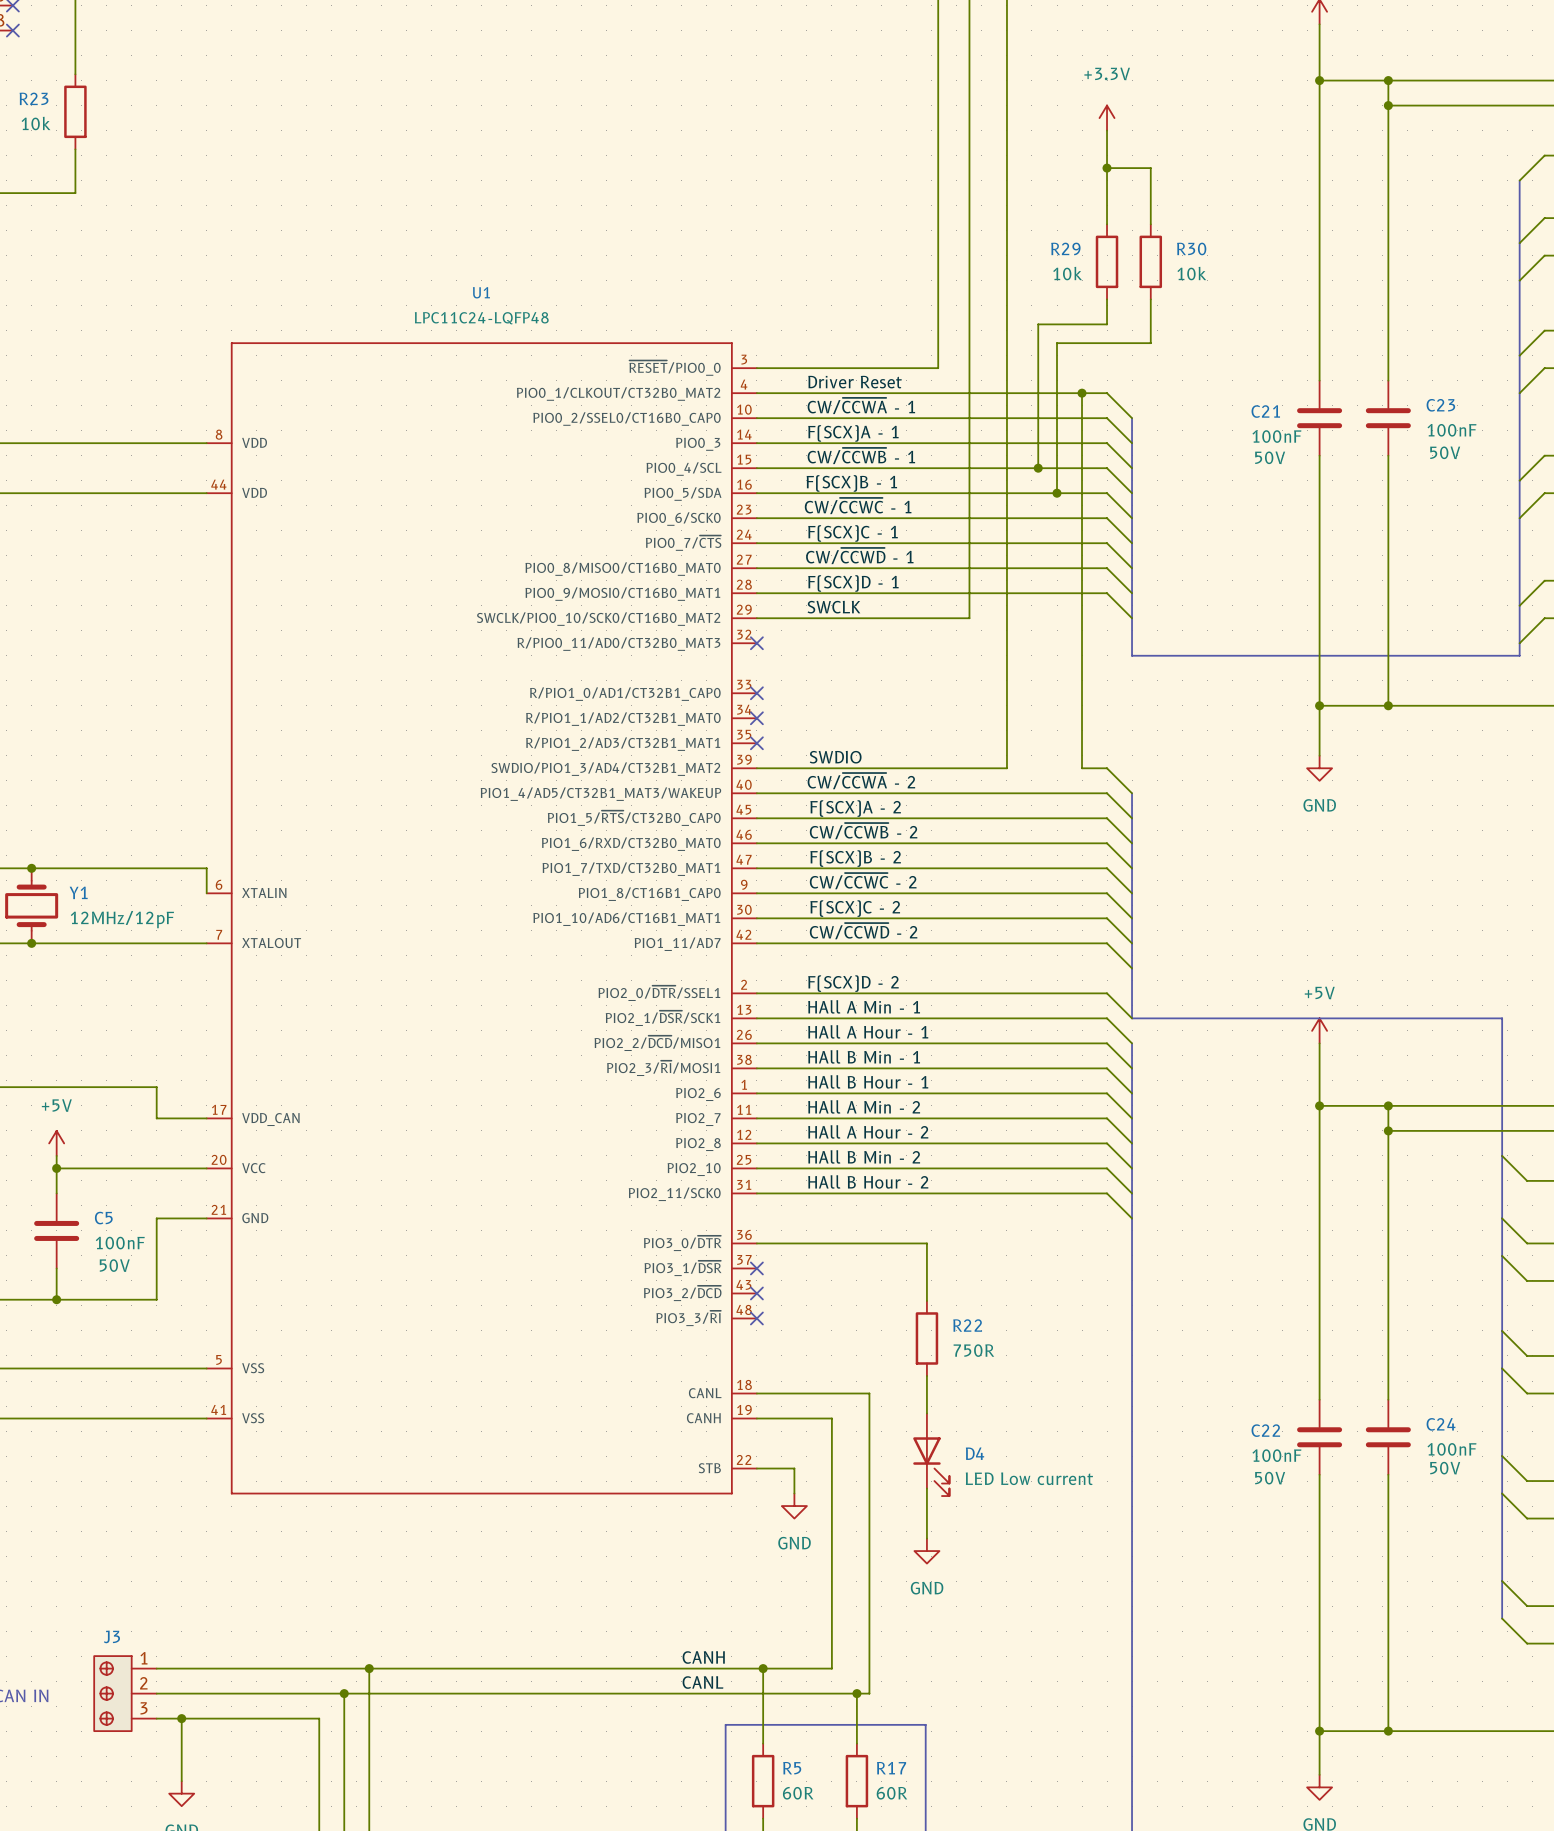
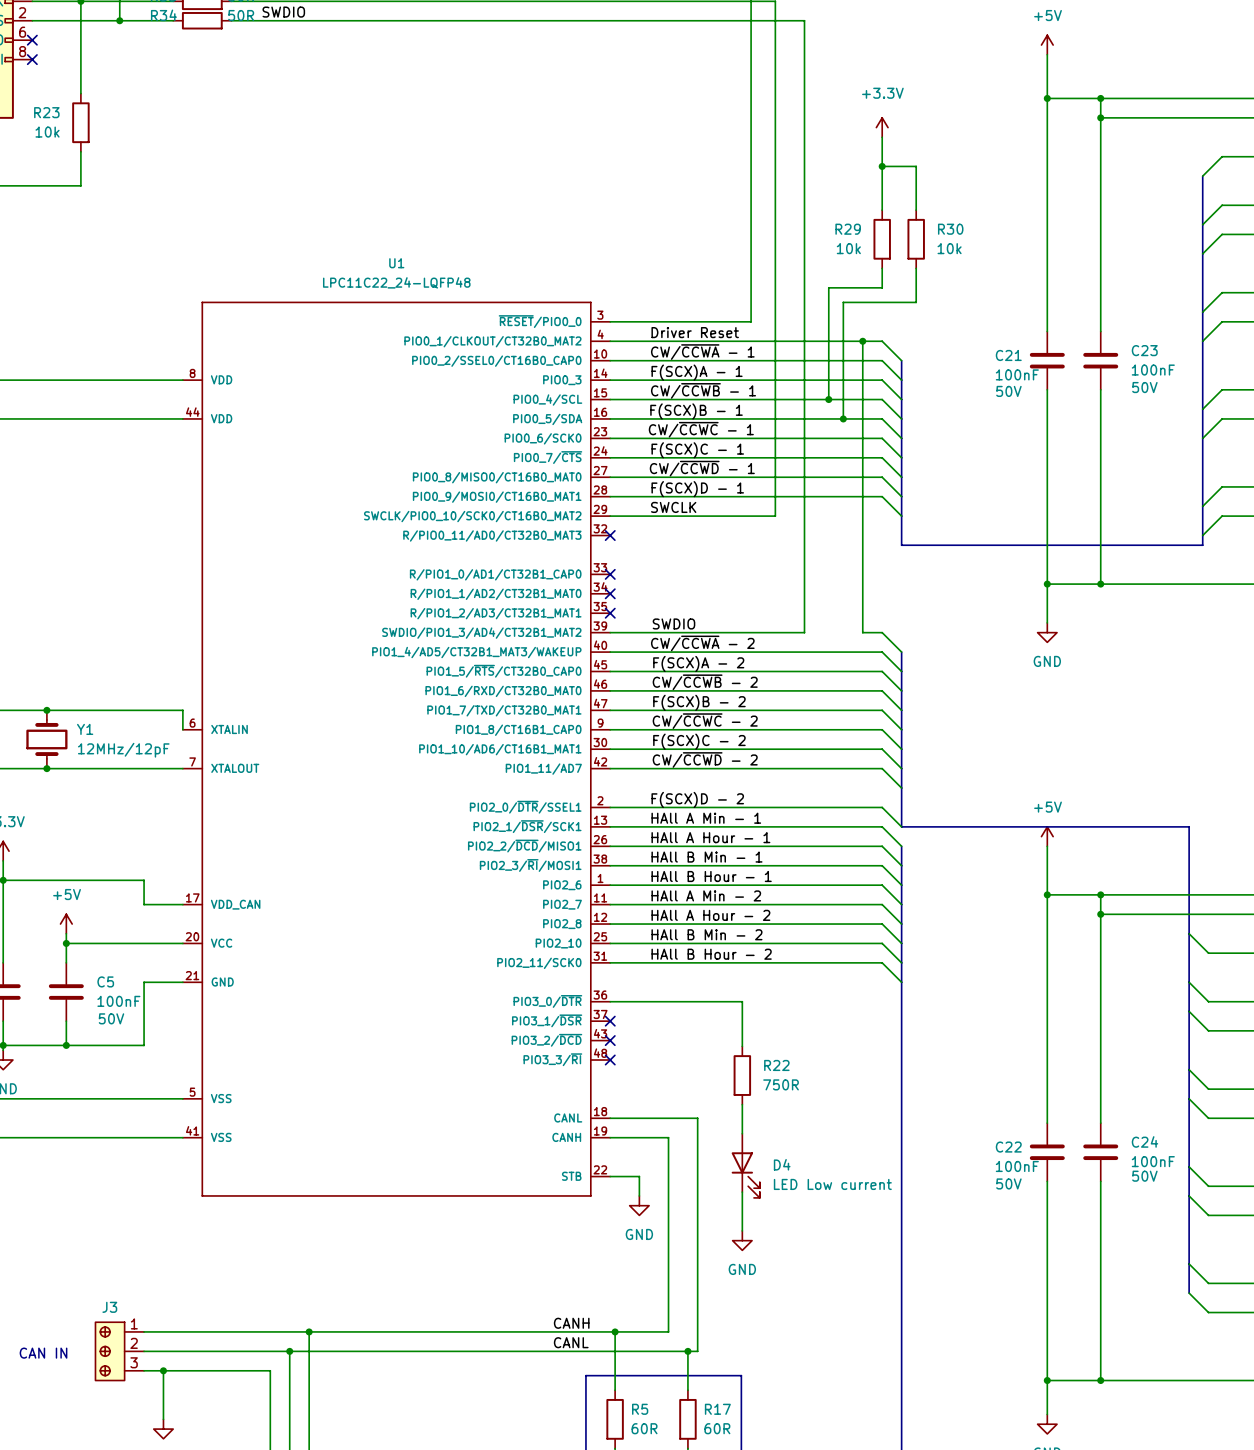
U1 value: LPC11C24-LQFP48 (481, 318) -> LPC11C22_24-LQFP48 (396, 282)

